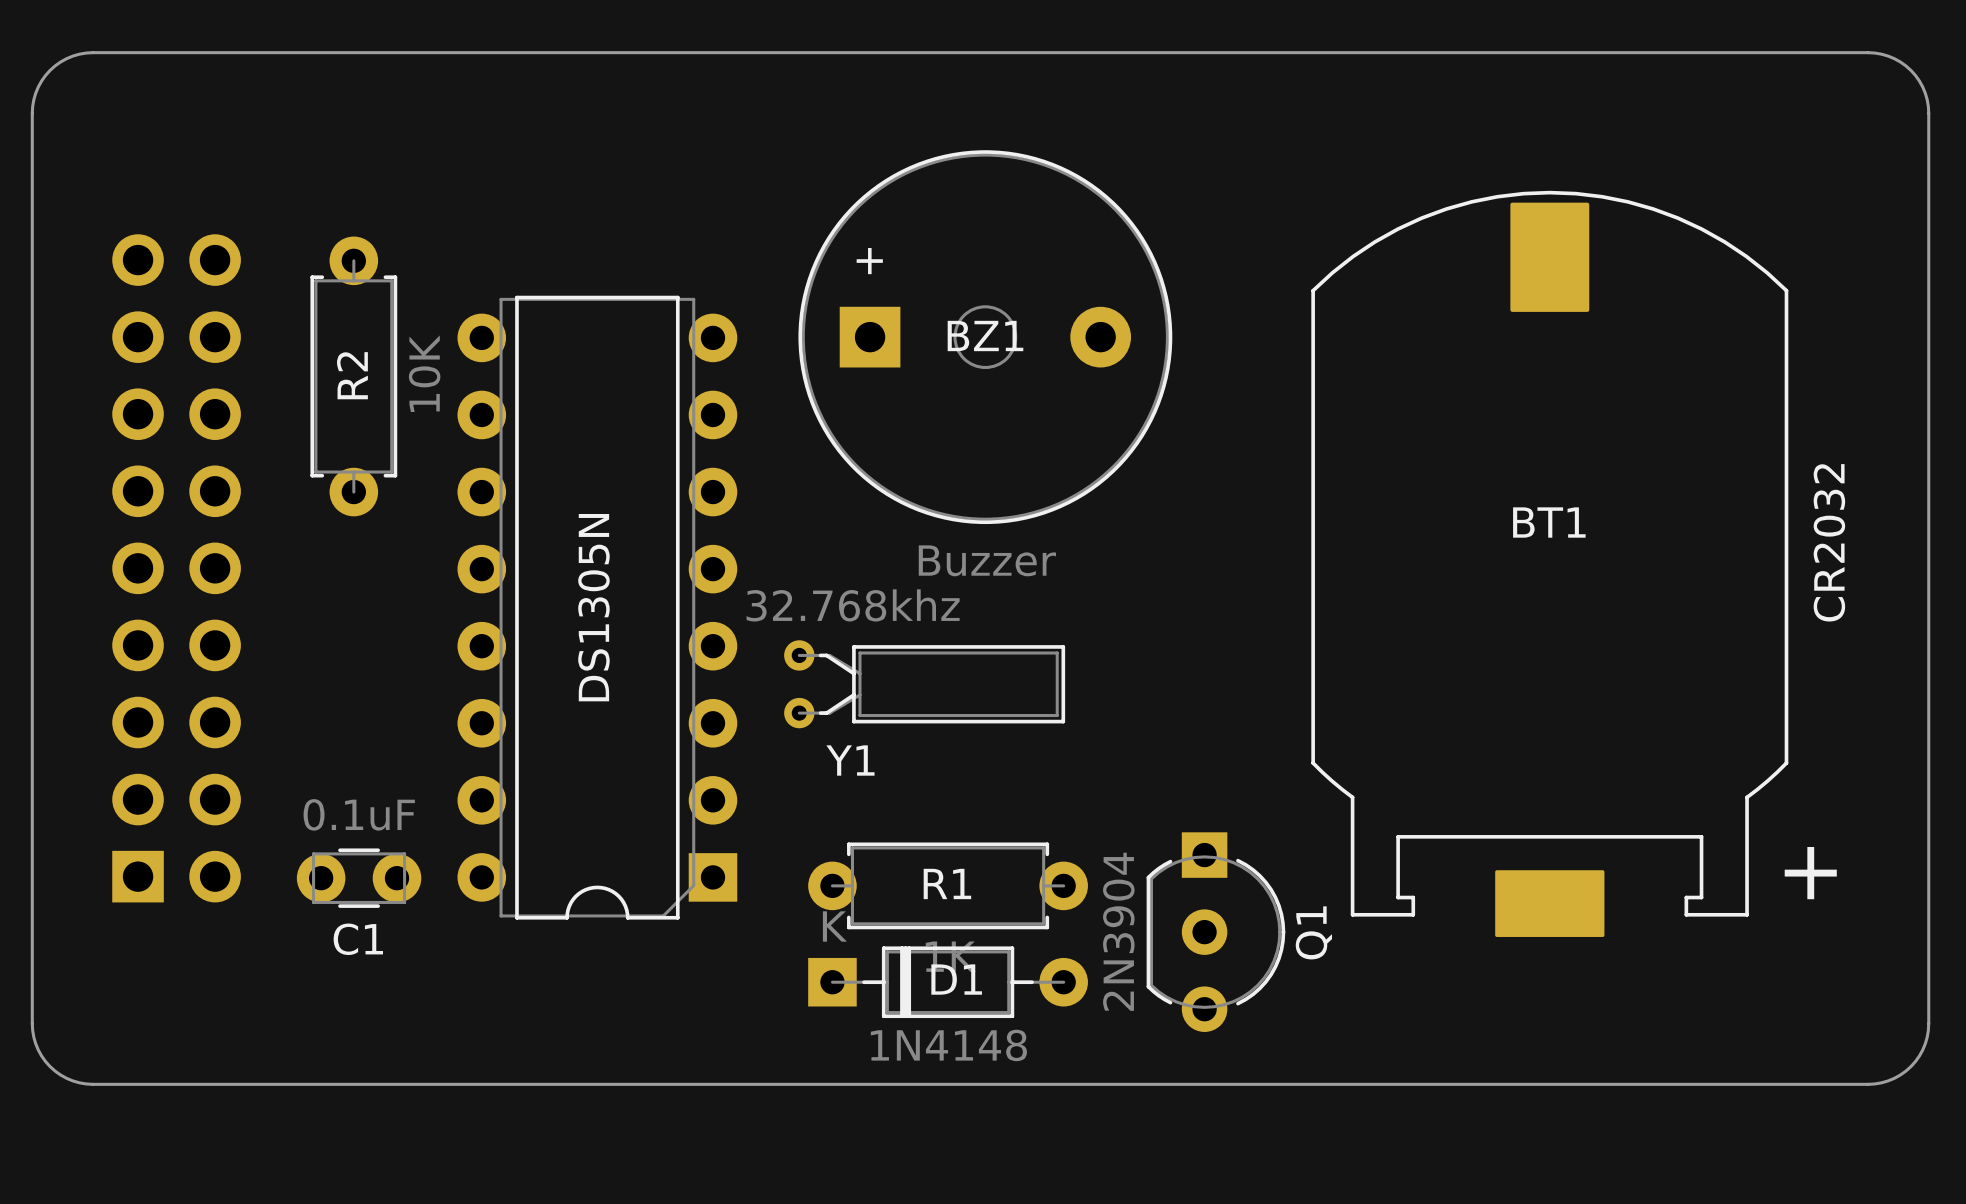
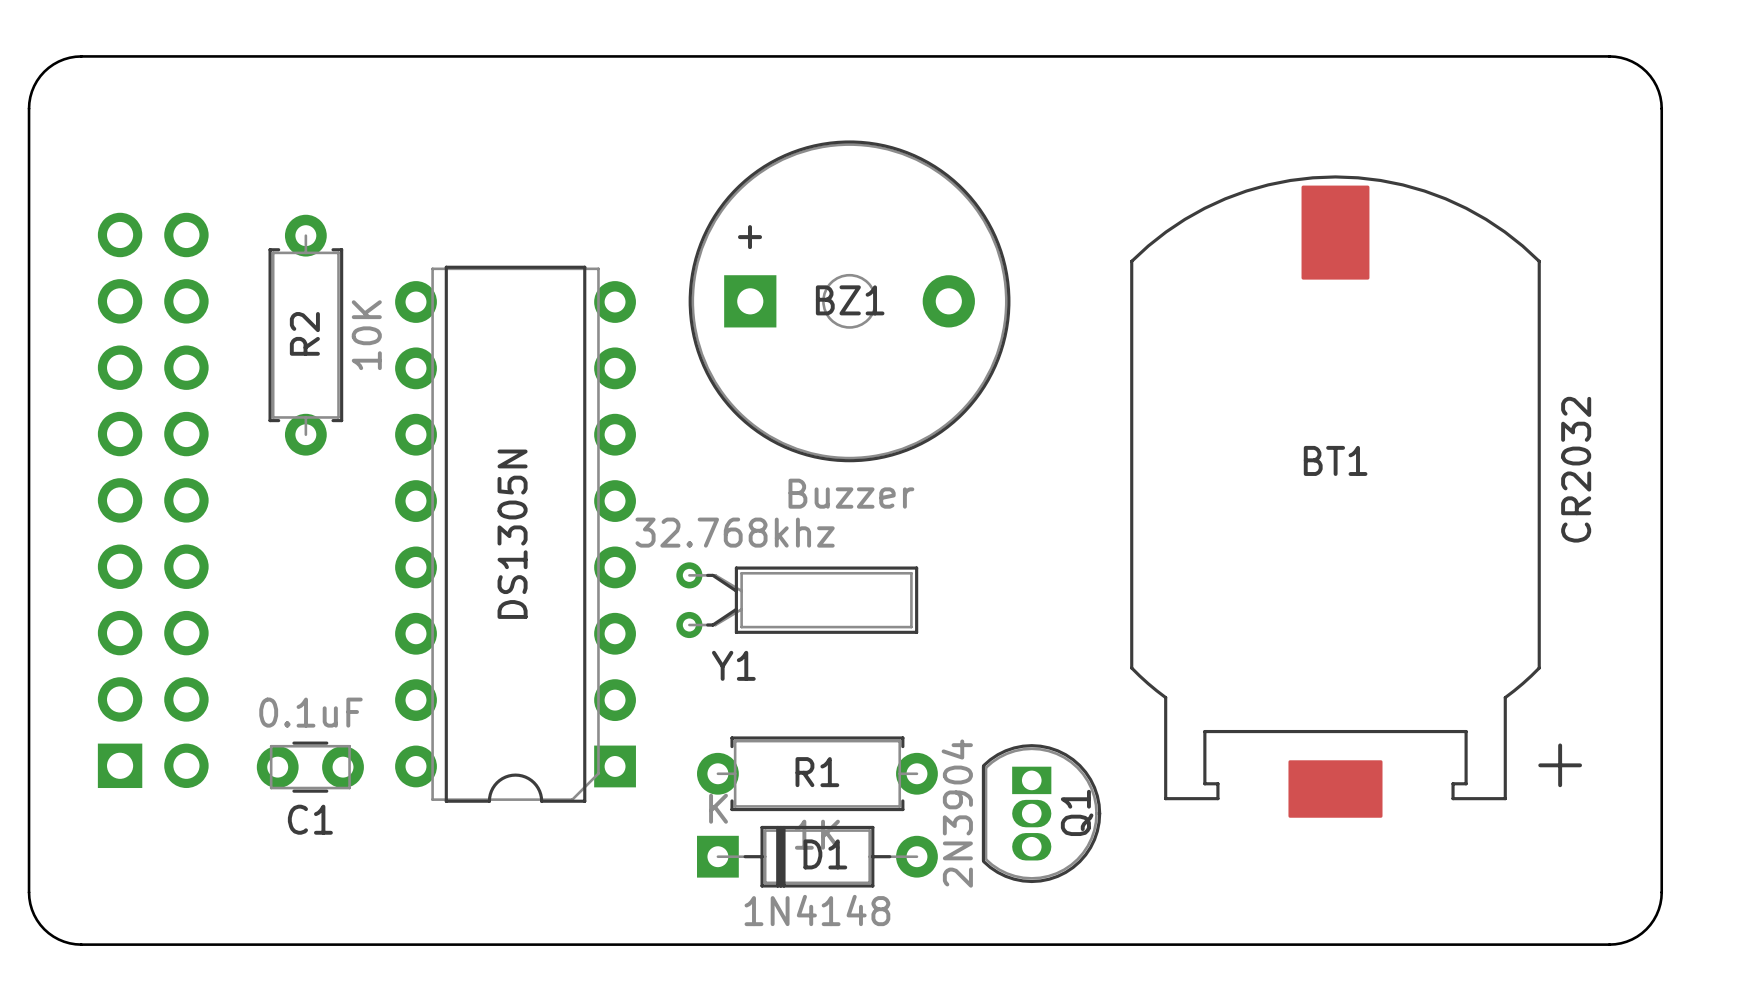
Q1 footprint: [1146, 832, 1286, 1032] -> [981, 744, 1102, 884]

